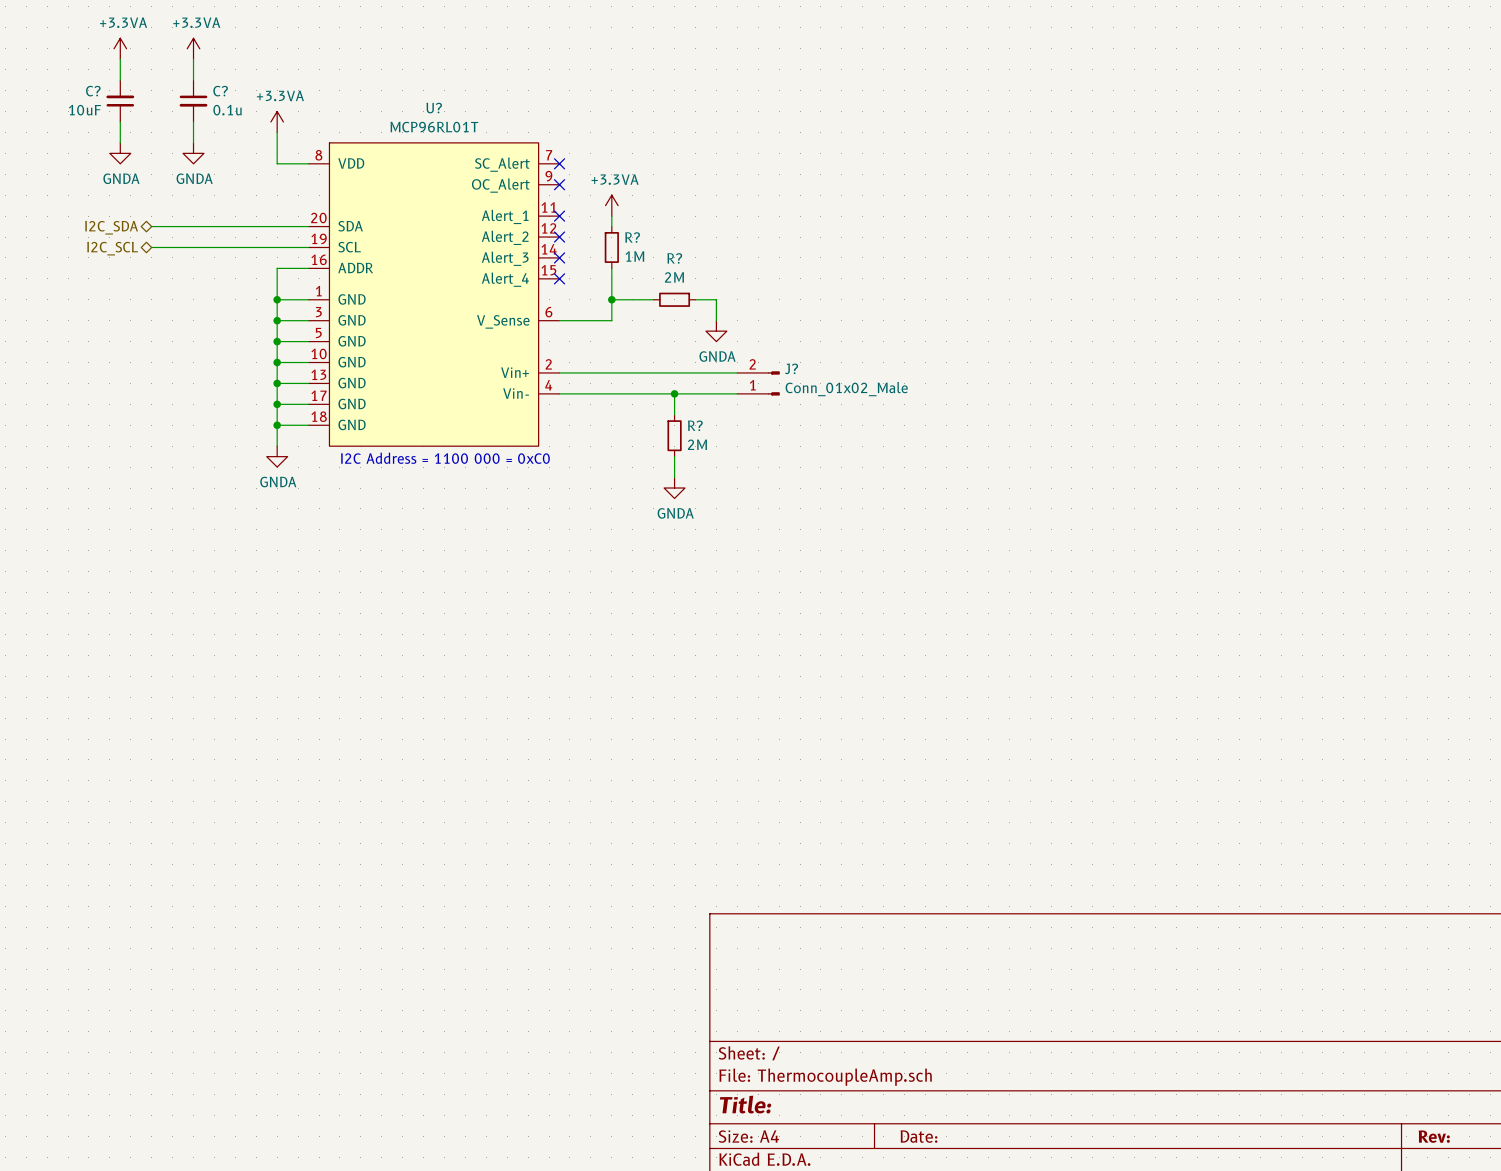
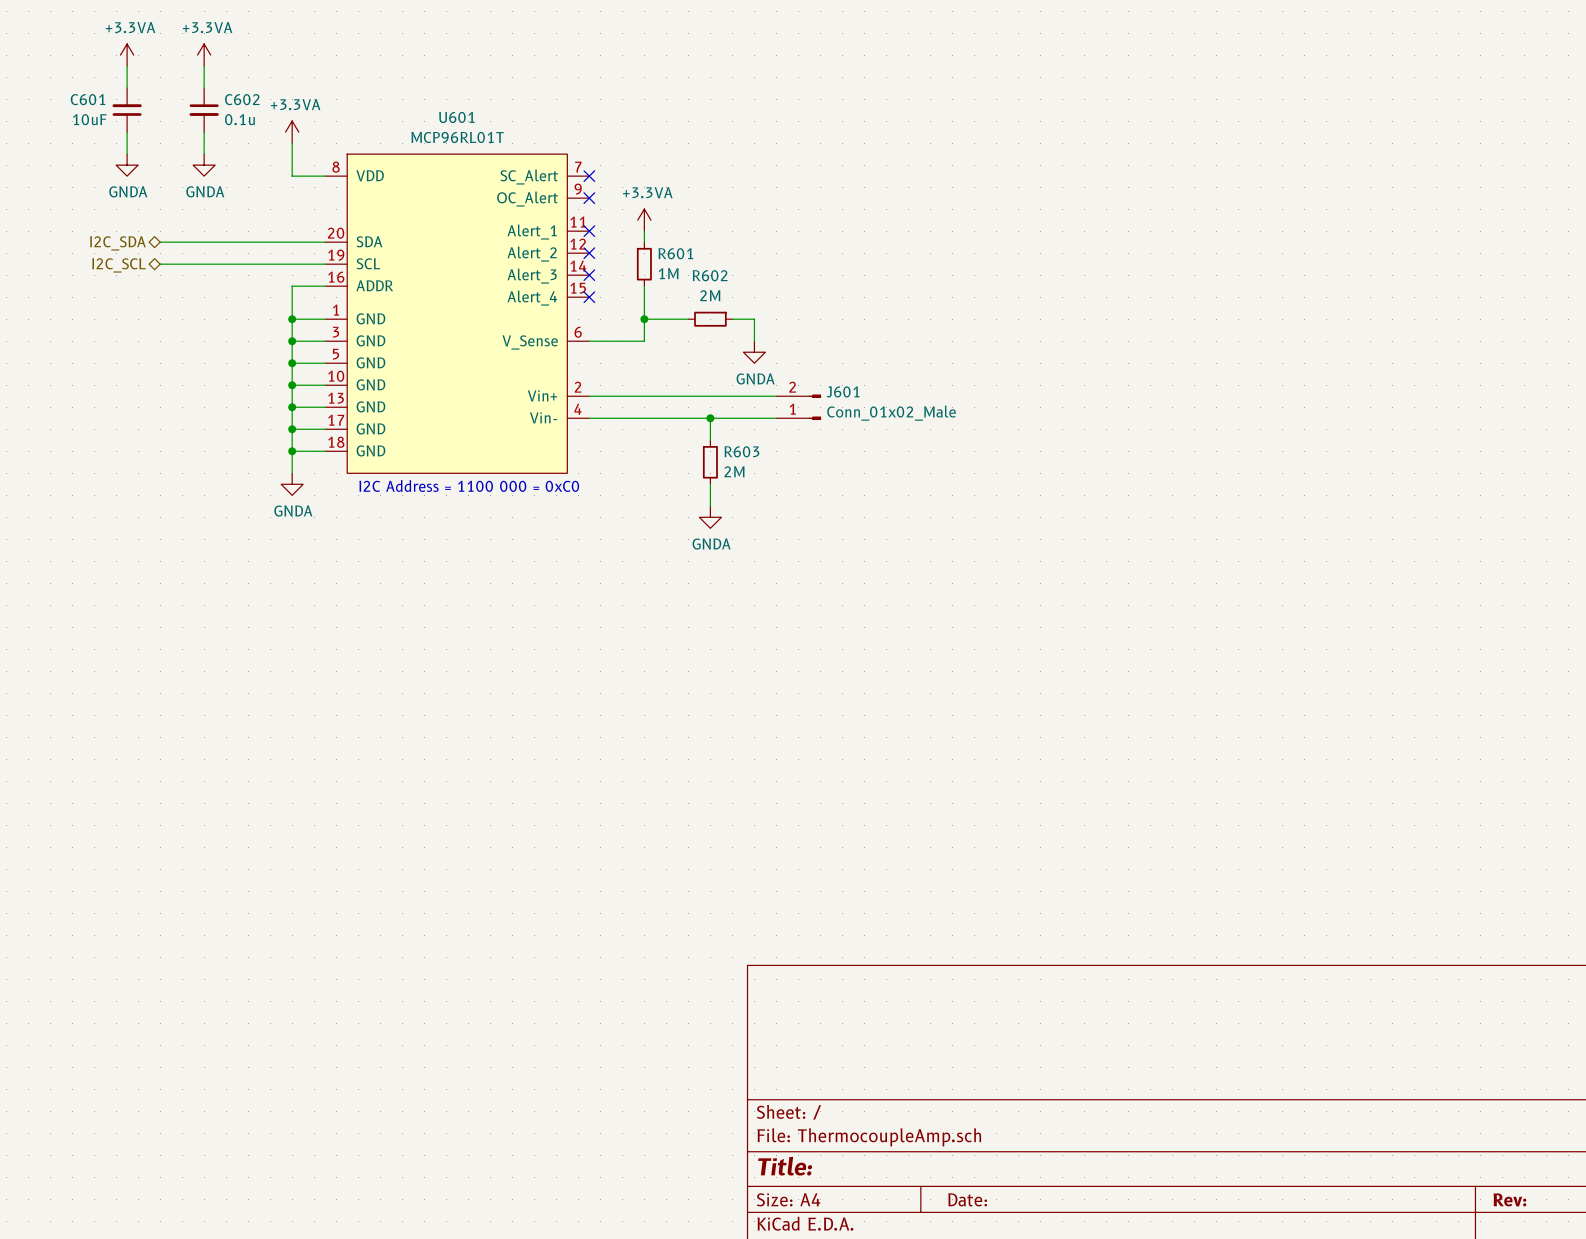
C? name: C? (93, 91) -> C601 (88, 99)
C? name: C? (220, 91) -> C602 (242, 99)
U? name: U? (434, 108) -> U601 (456, 117)
R? name: R? (632, 237) -> R601 (675, 253)
R? name: R? (674, 258) -> R602 (710, 275)
J? name: J? (791, 368) -> J601 (843, 391)
R? name: R? (695, 425) -> R603 (741, 451)

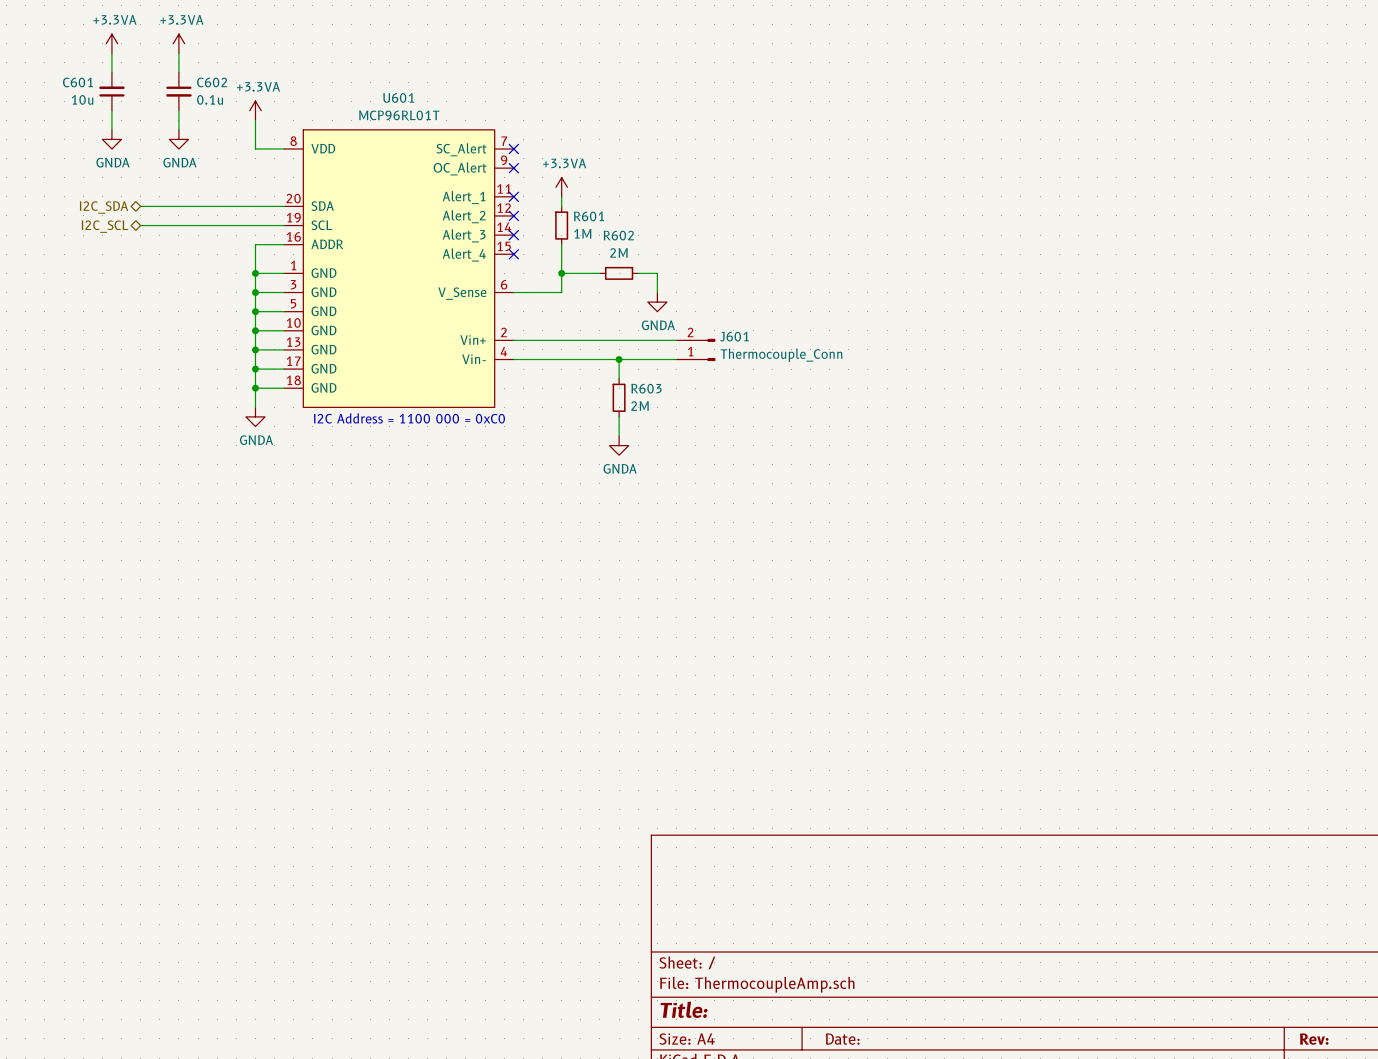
C601 value: 10uF (89, 119) -> 10u (82, 99)
J601 value: Conn_01x02_Male (891, 413) -> Thermocouple_Conn (781, 355)

